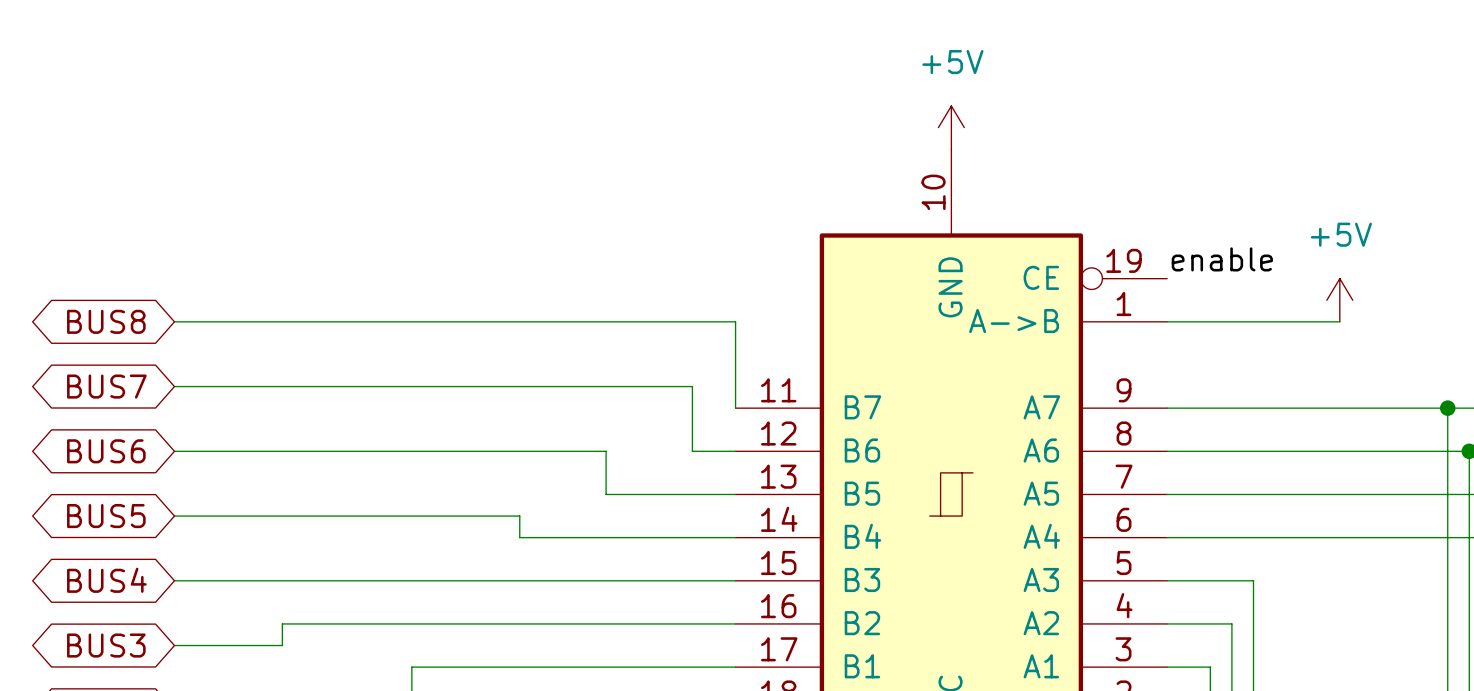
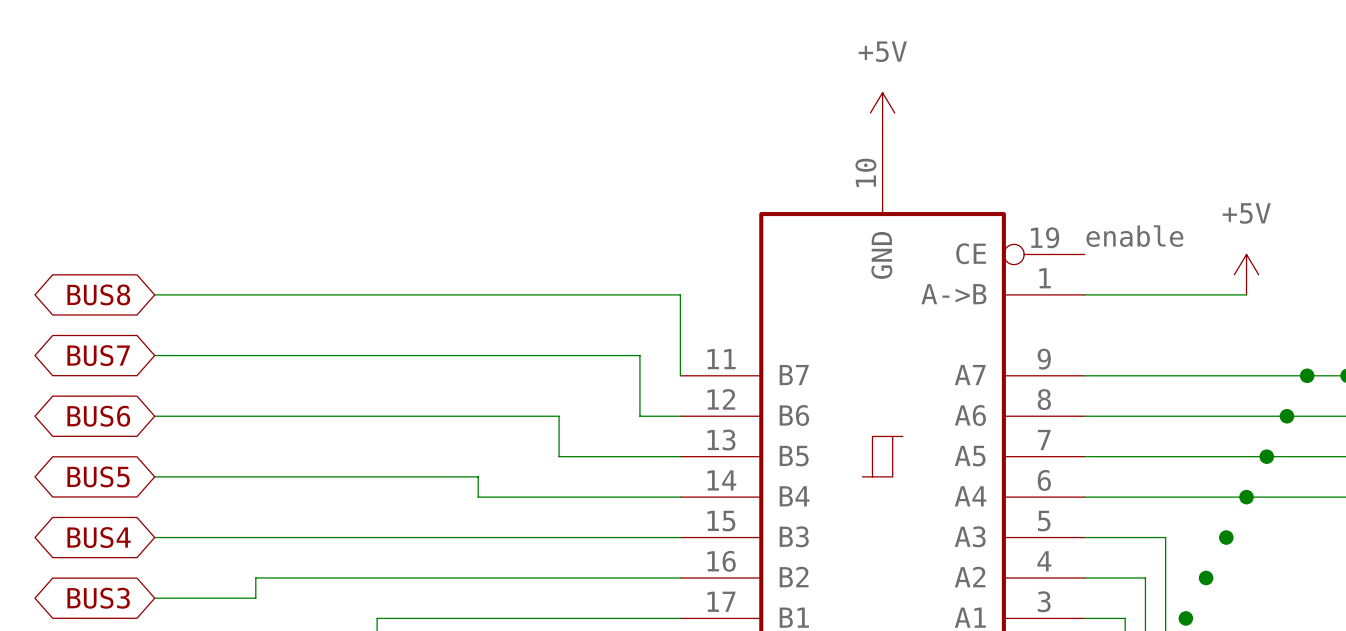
junction: none -> (1307, 375)
junction: none -> (1286, 416)
junction: none -> (1266, 456)
junction: none -> (1246, 497)
junction: none -> (1226, 537)
junction: none -> (1206, 577)
junction: none -> (1185, 618)

